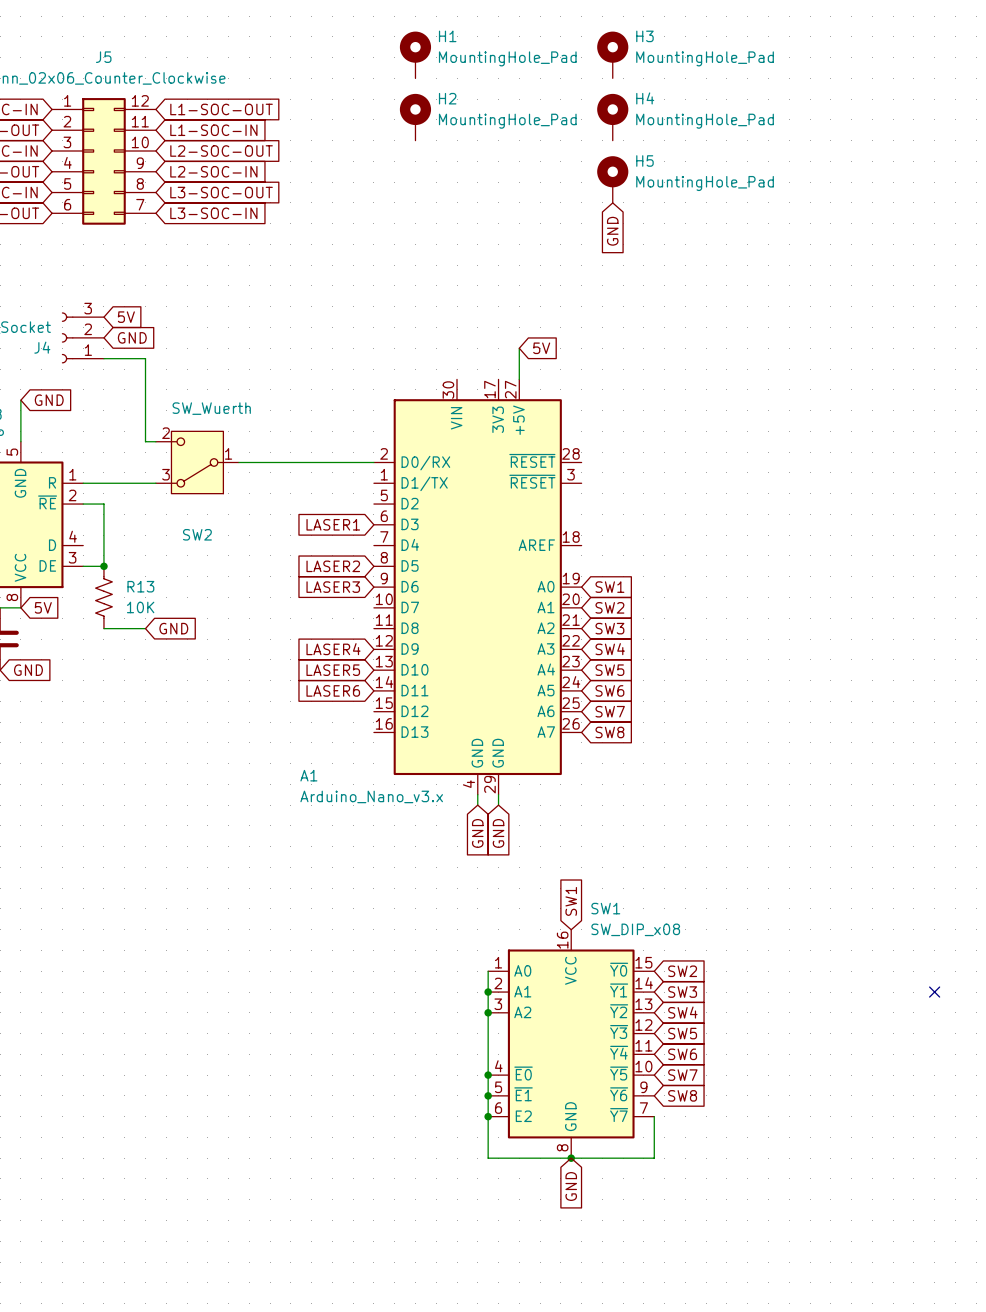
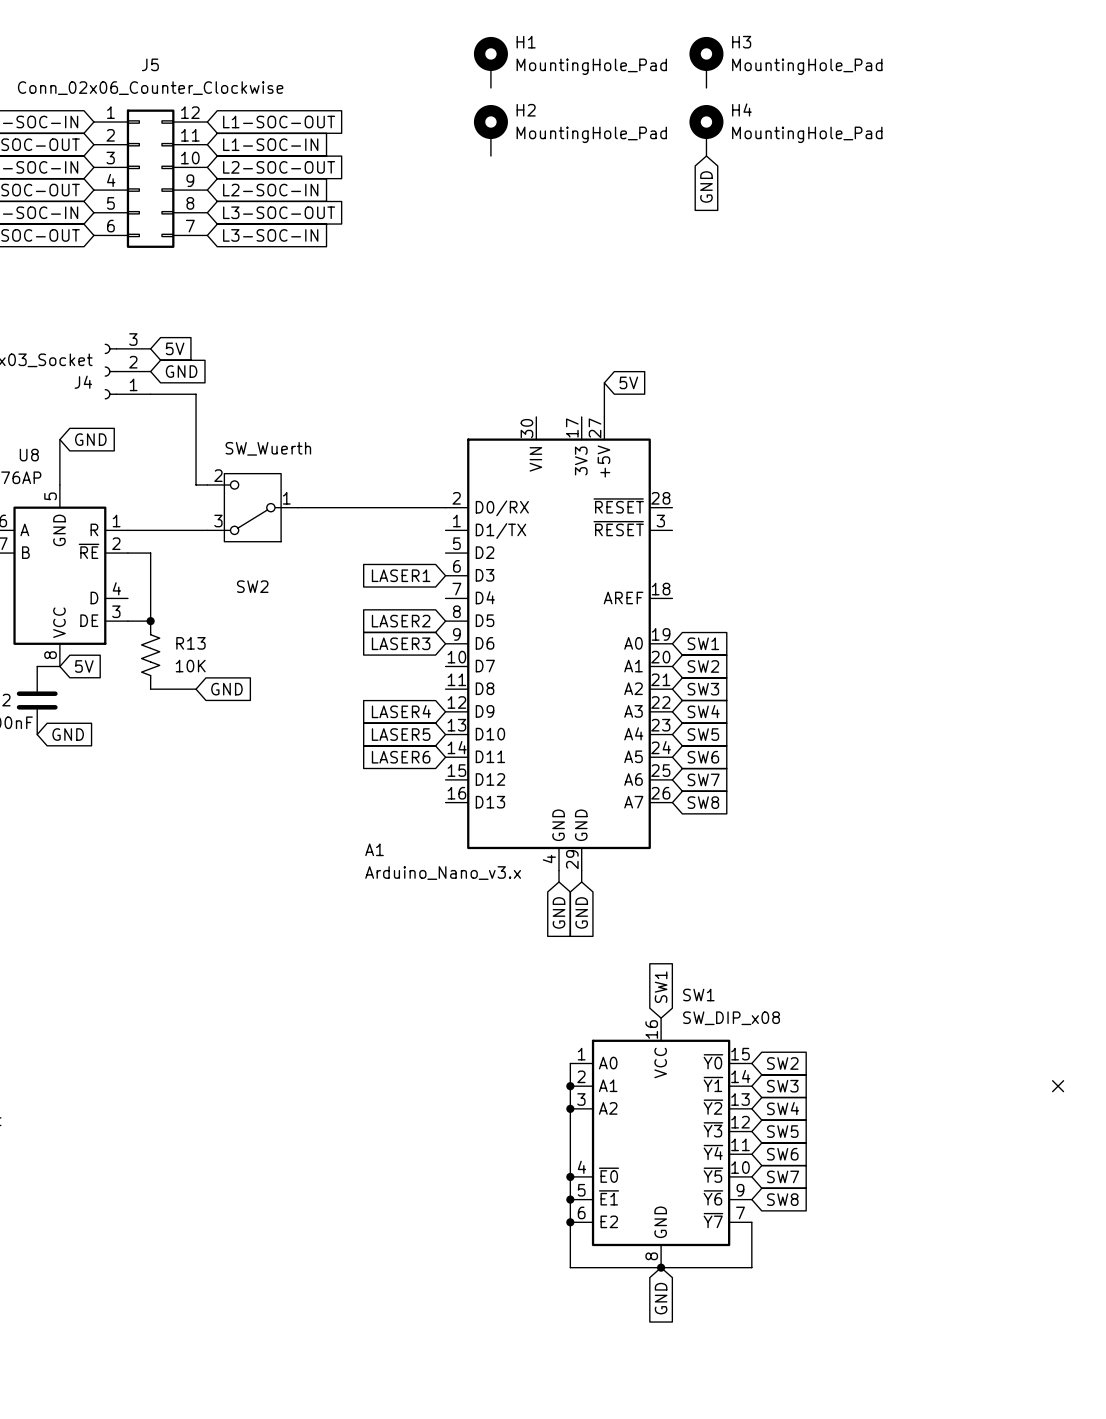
H5: MountingHole_Pad (612, 179) -> none
global label position: GND (612, 231) -> GND (706, 186)

